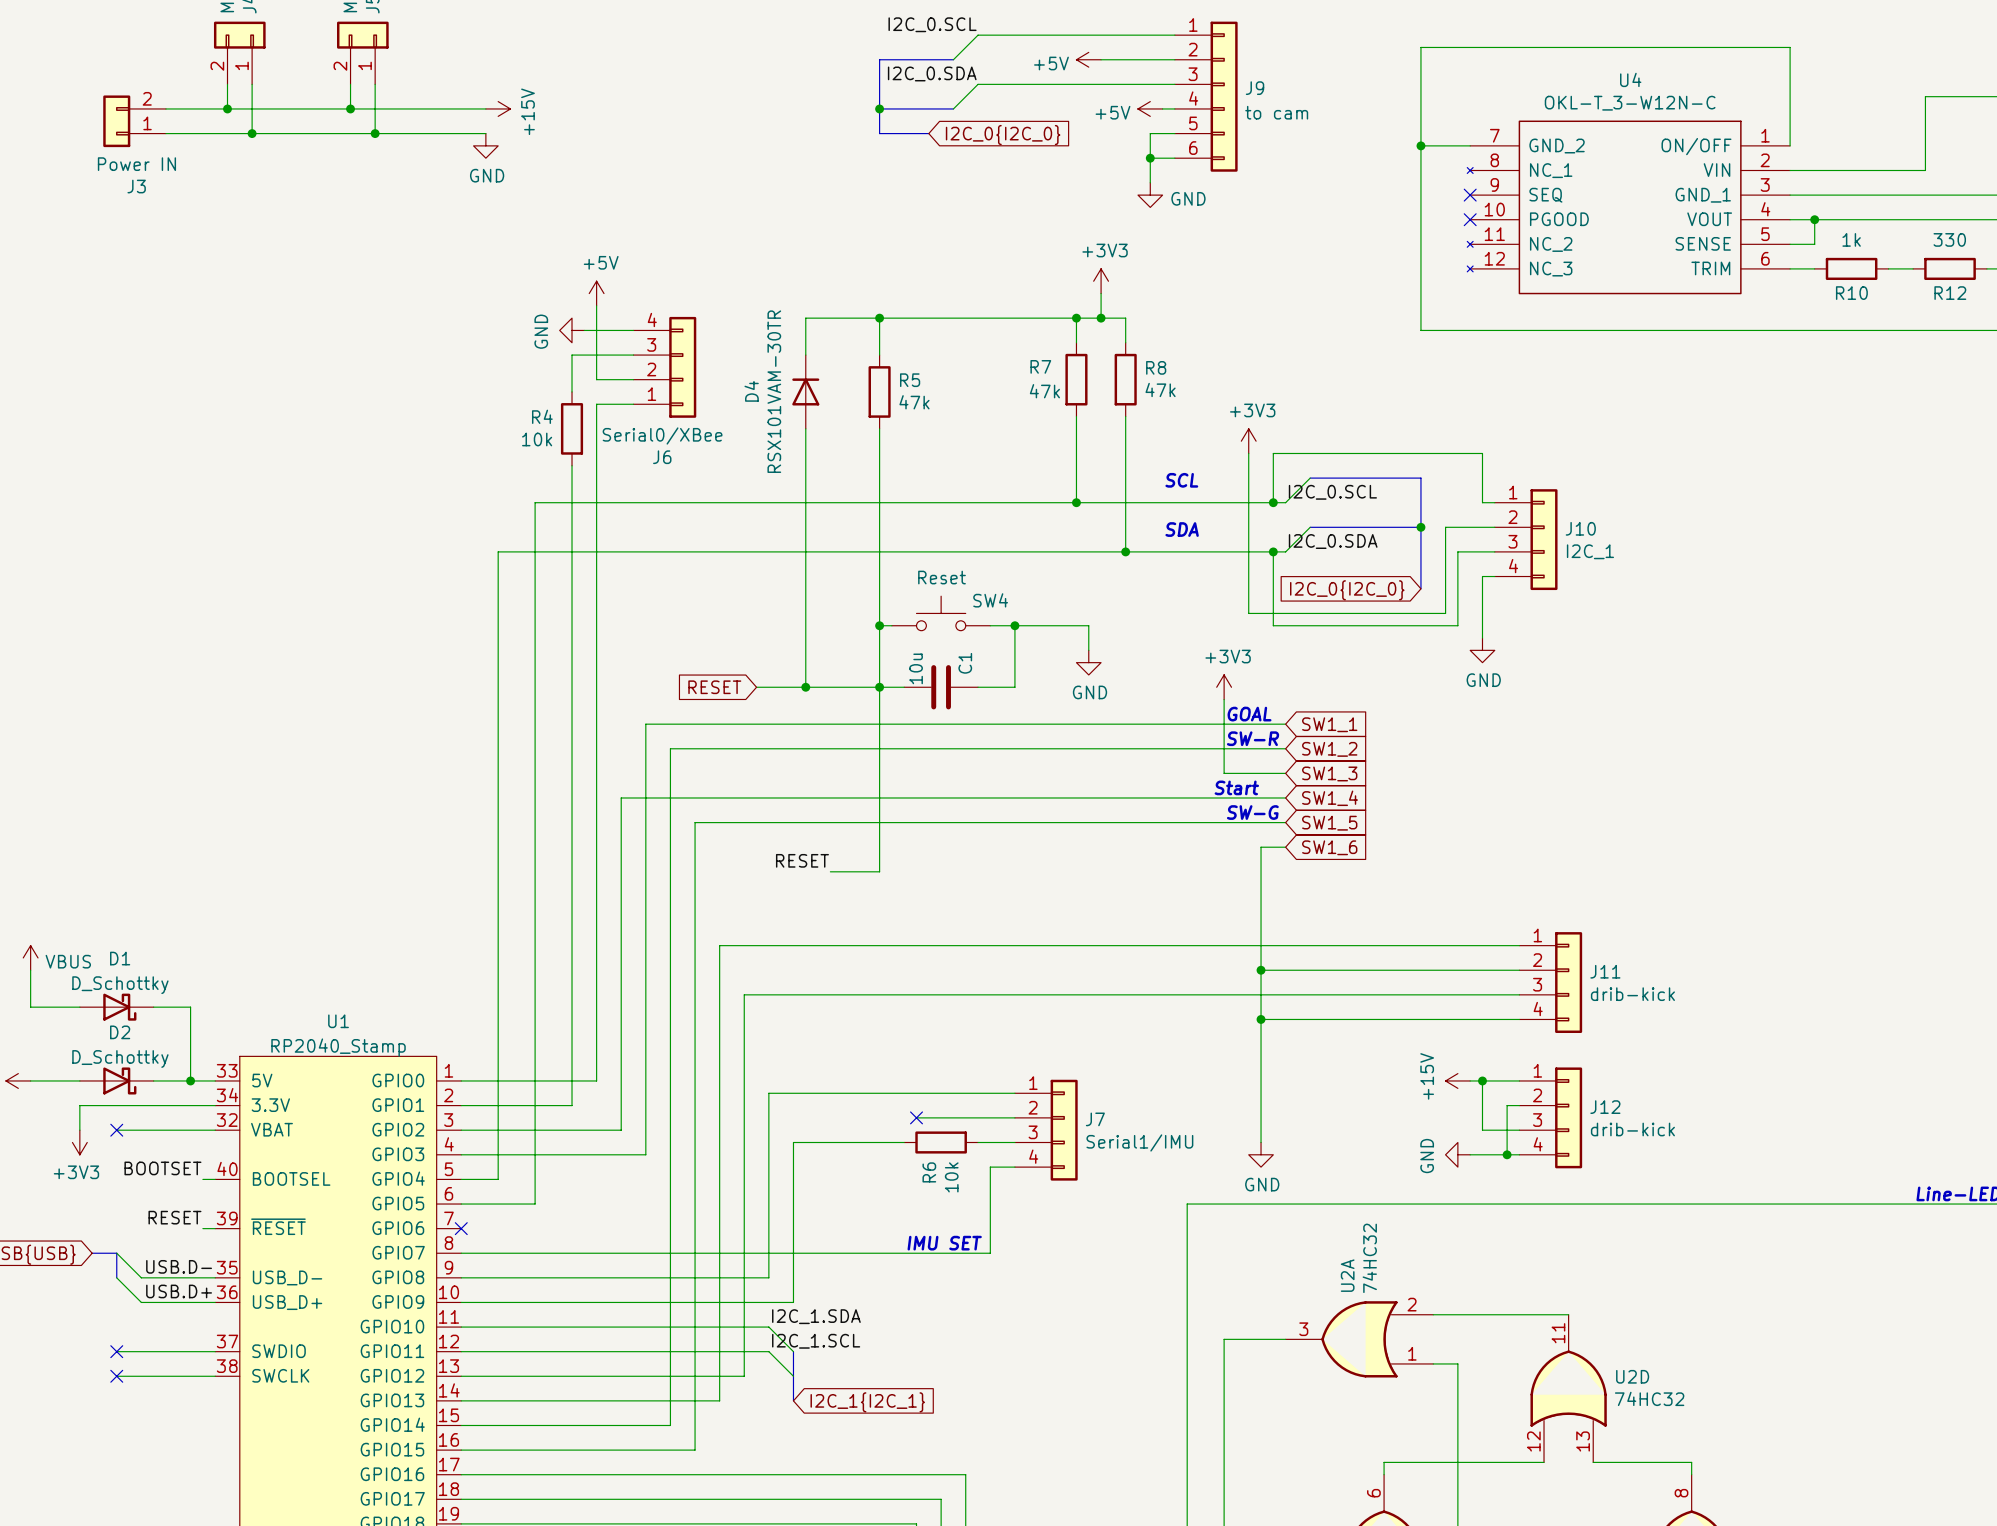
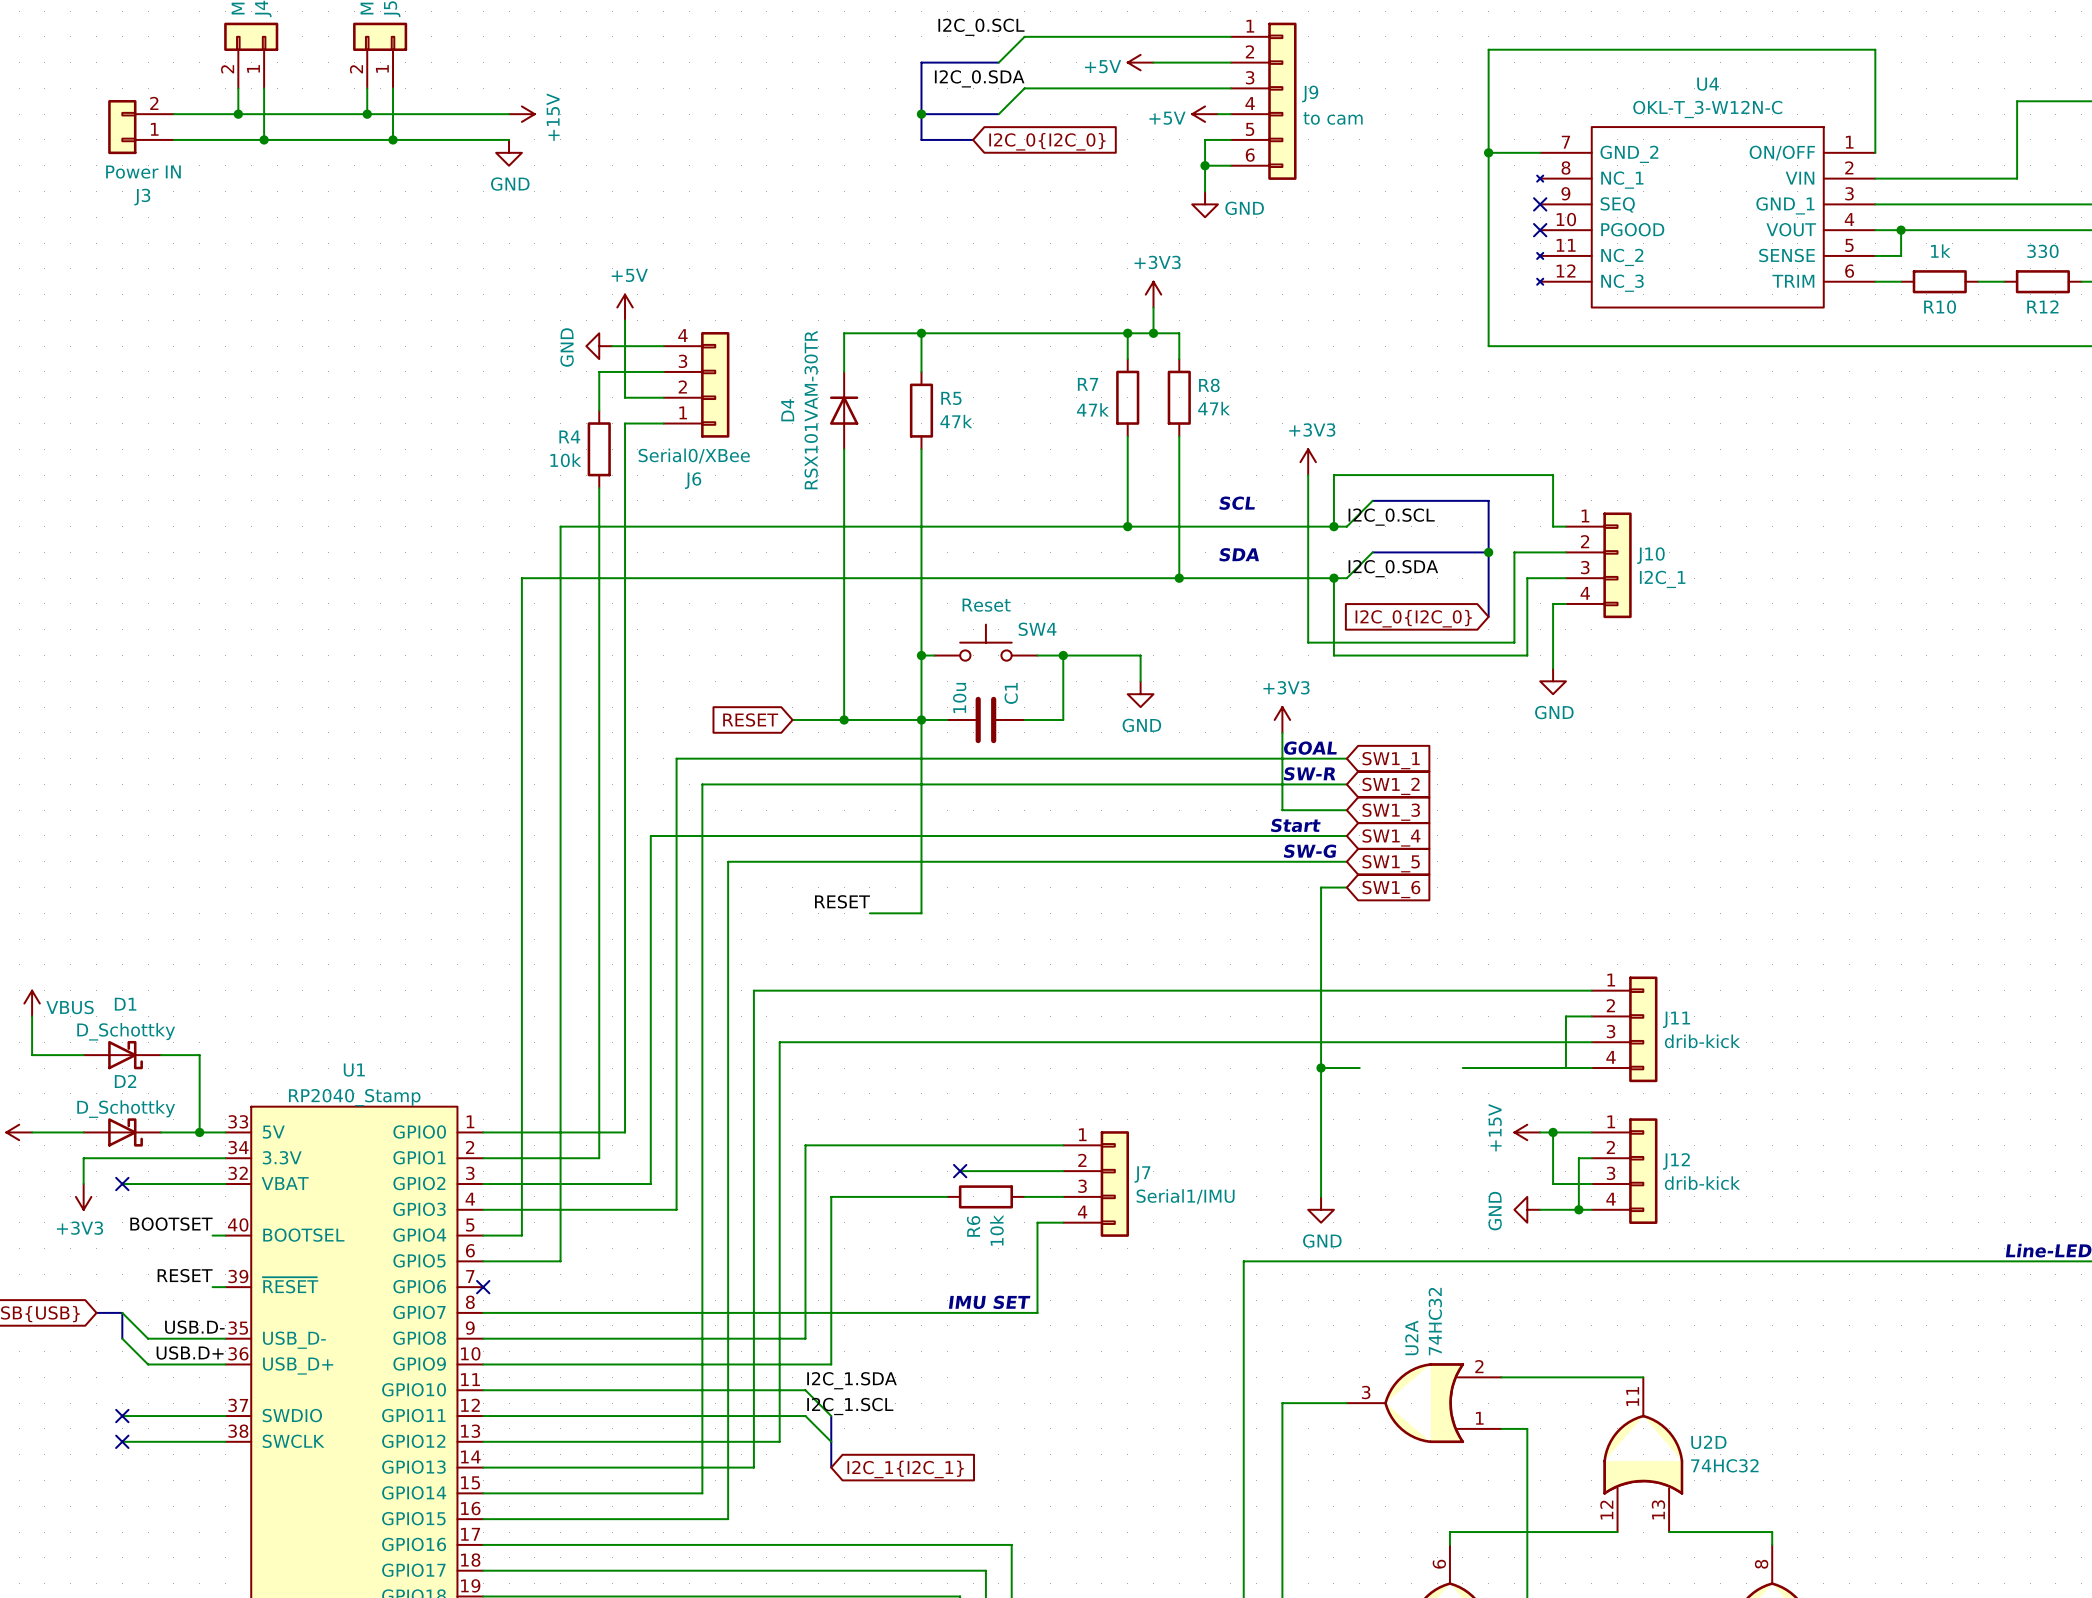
wire: (1261, 970) (1494, 970) -> (1565, 1068) (1565, 1016)
junction: (1261, 970) -> none
wire: (1297, 1019) (1396, 1019) -> none

